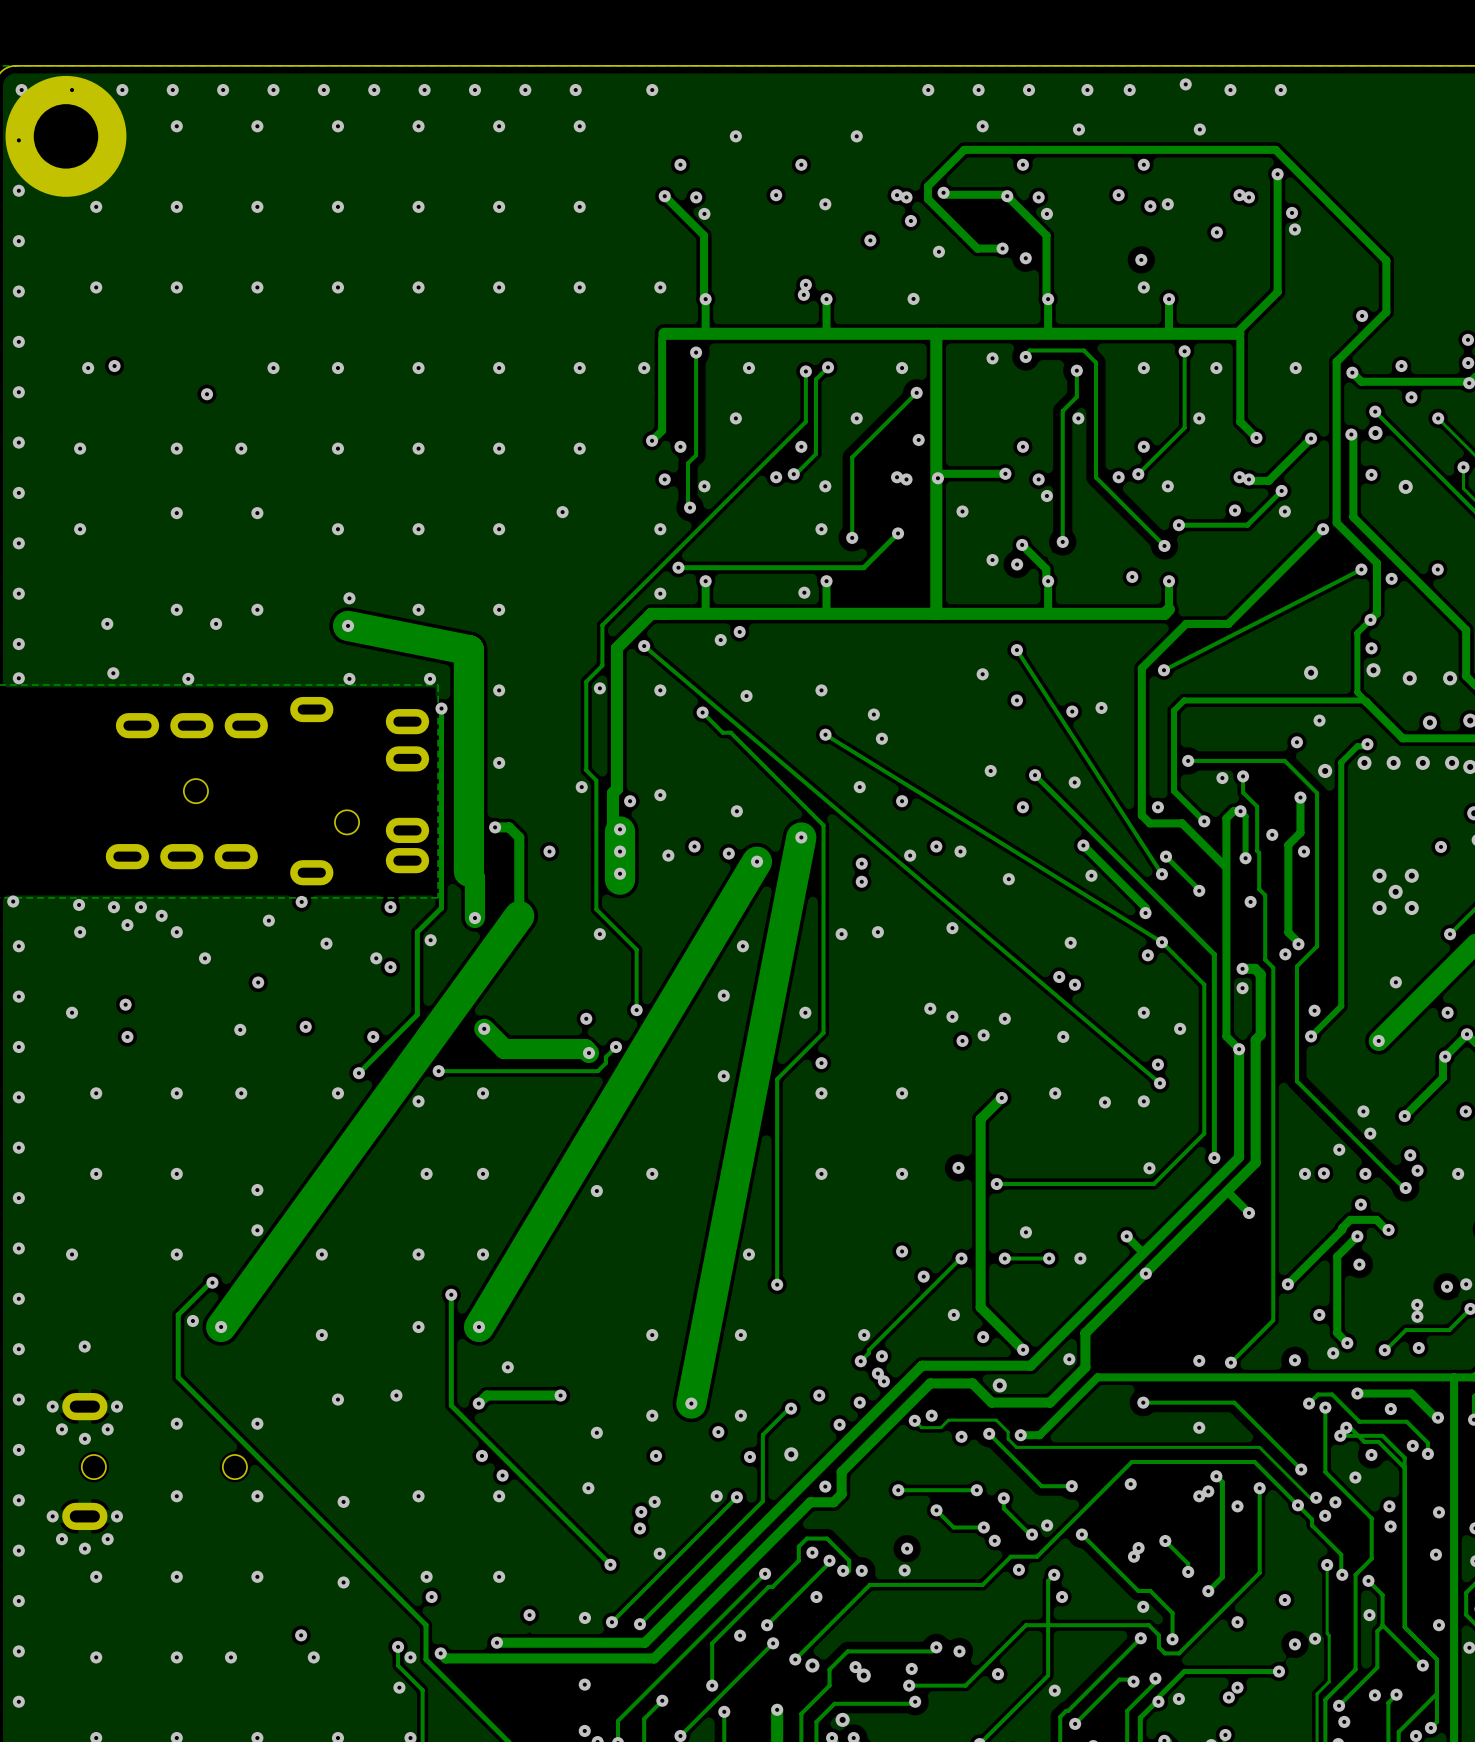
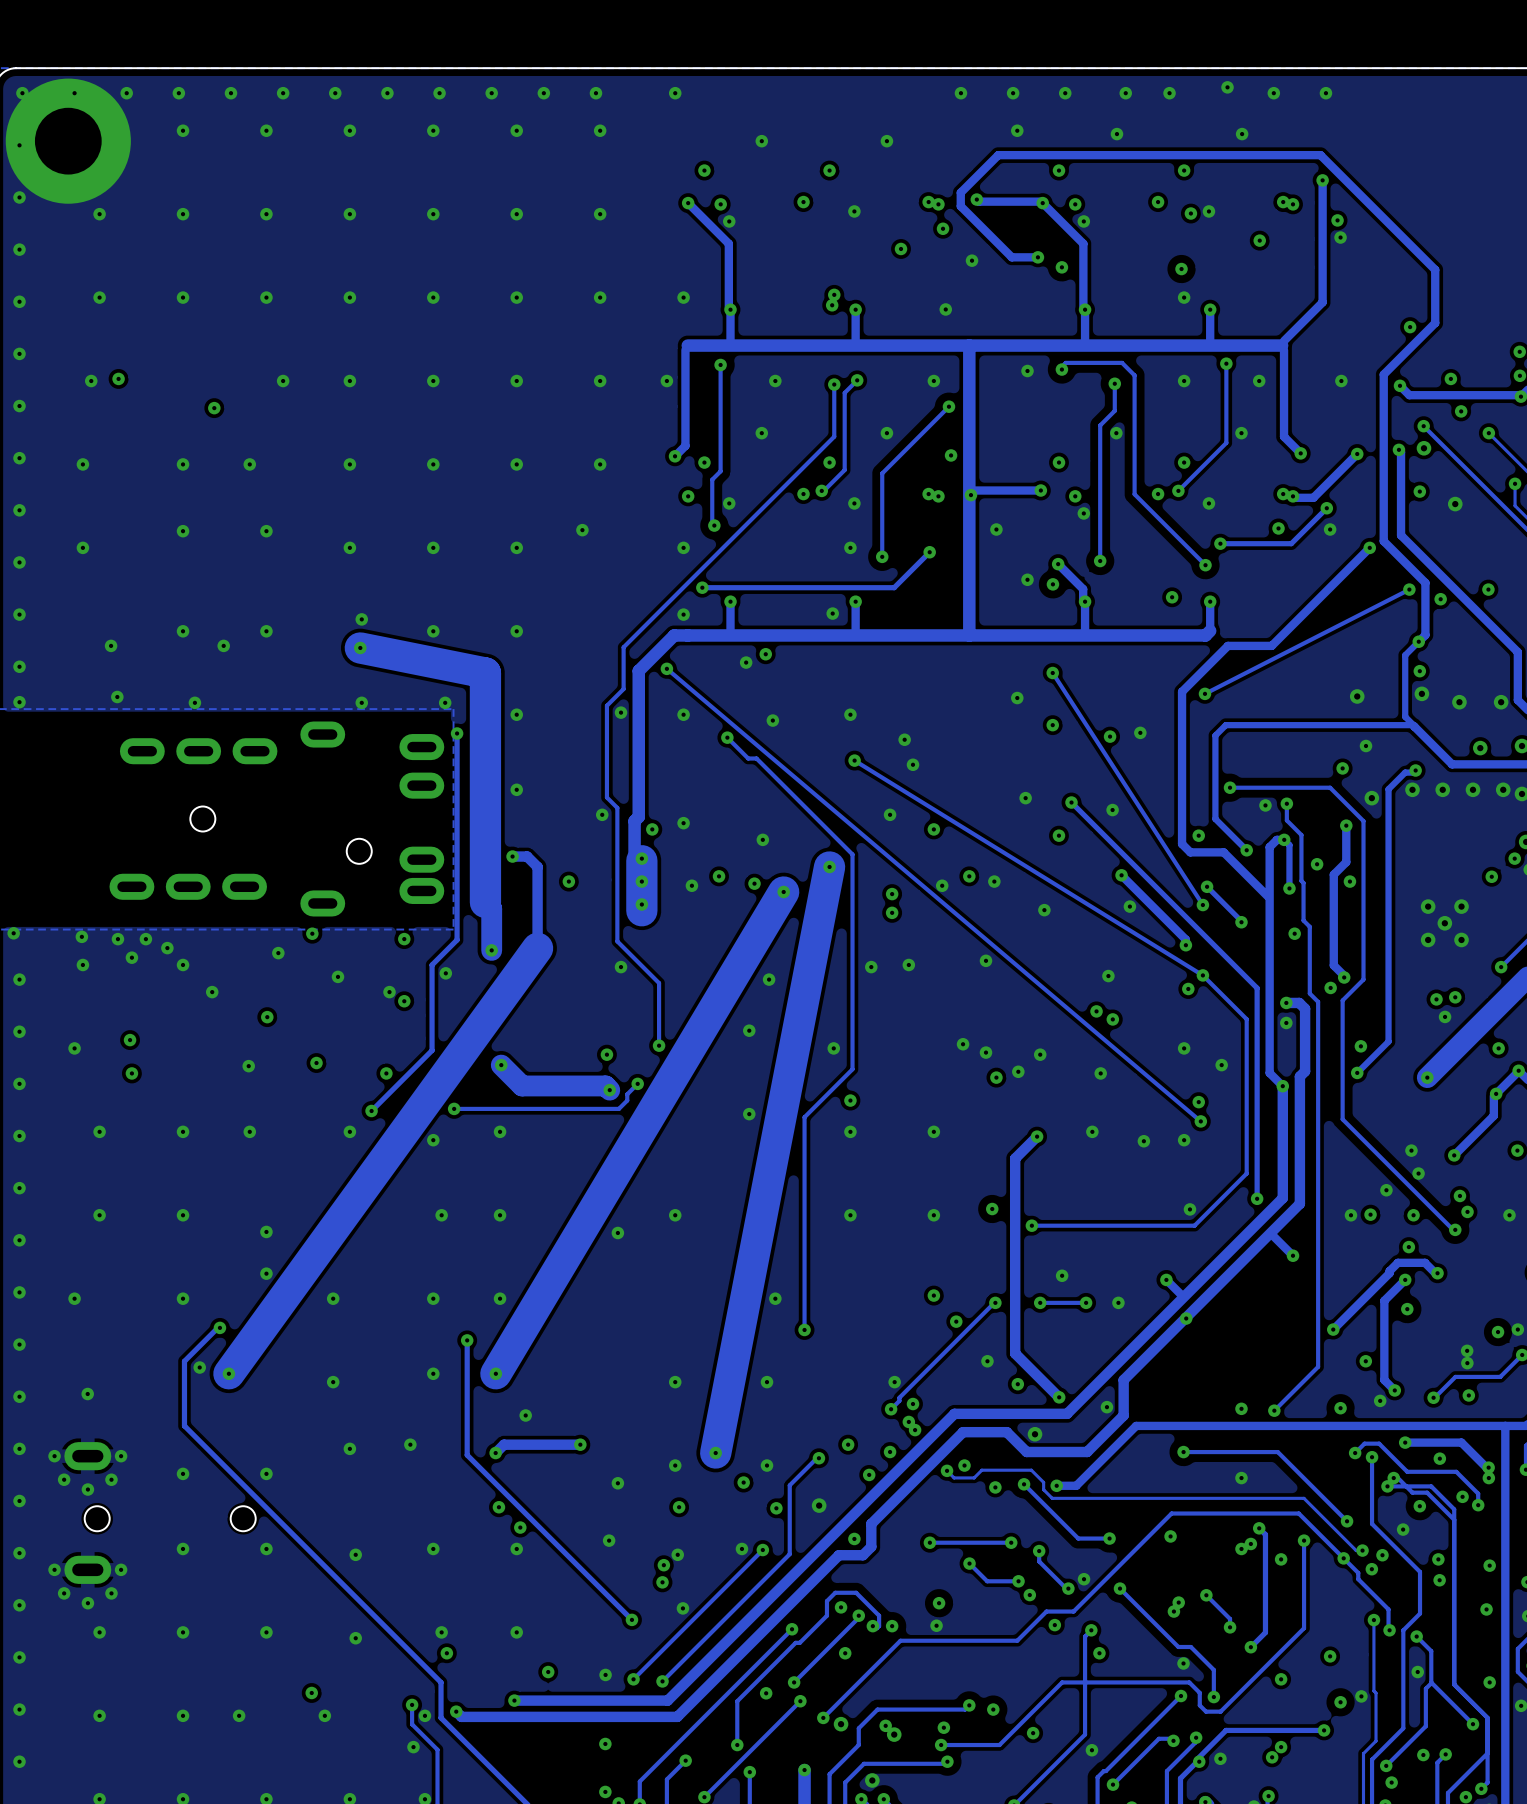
via: none -> (1514, 858)
via: none -> (1455, 997)
via: none -> (1436, 999)
via: none -> (1488, 1478)

